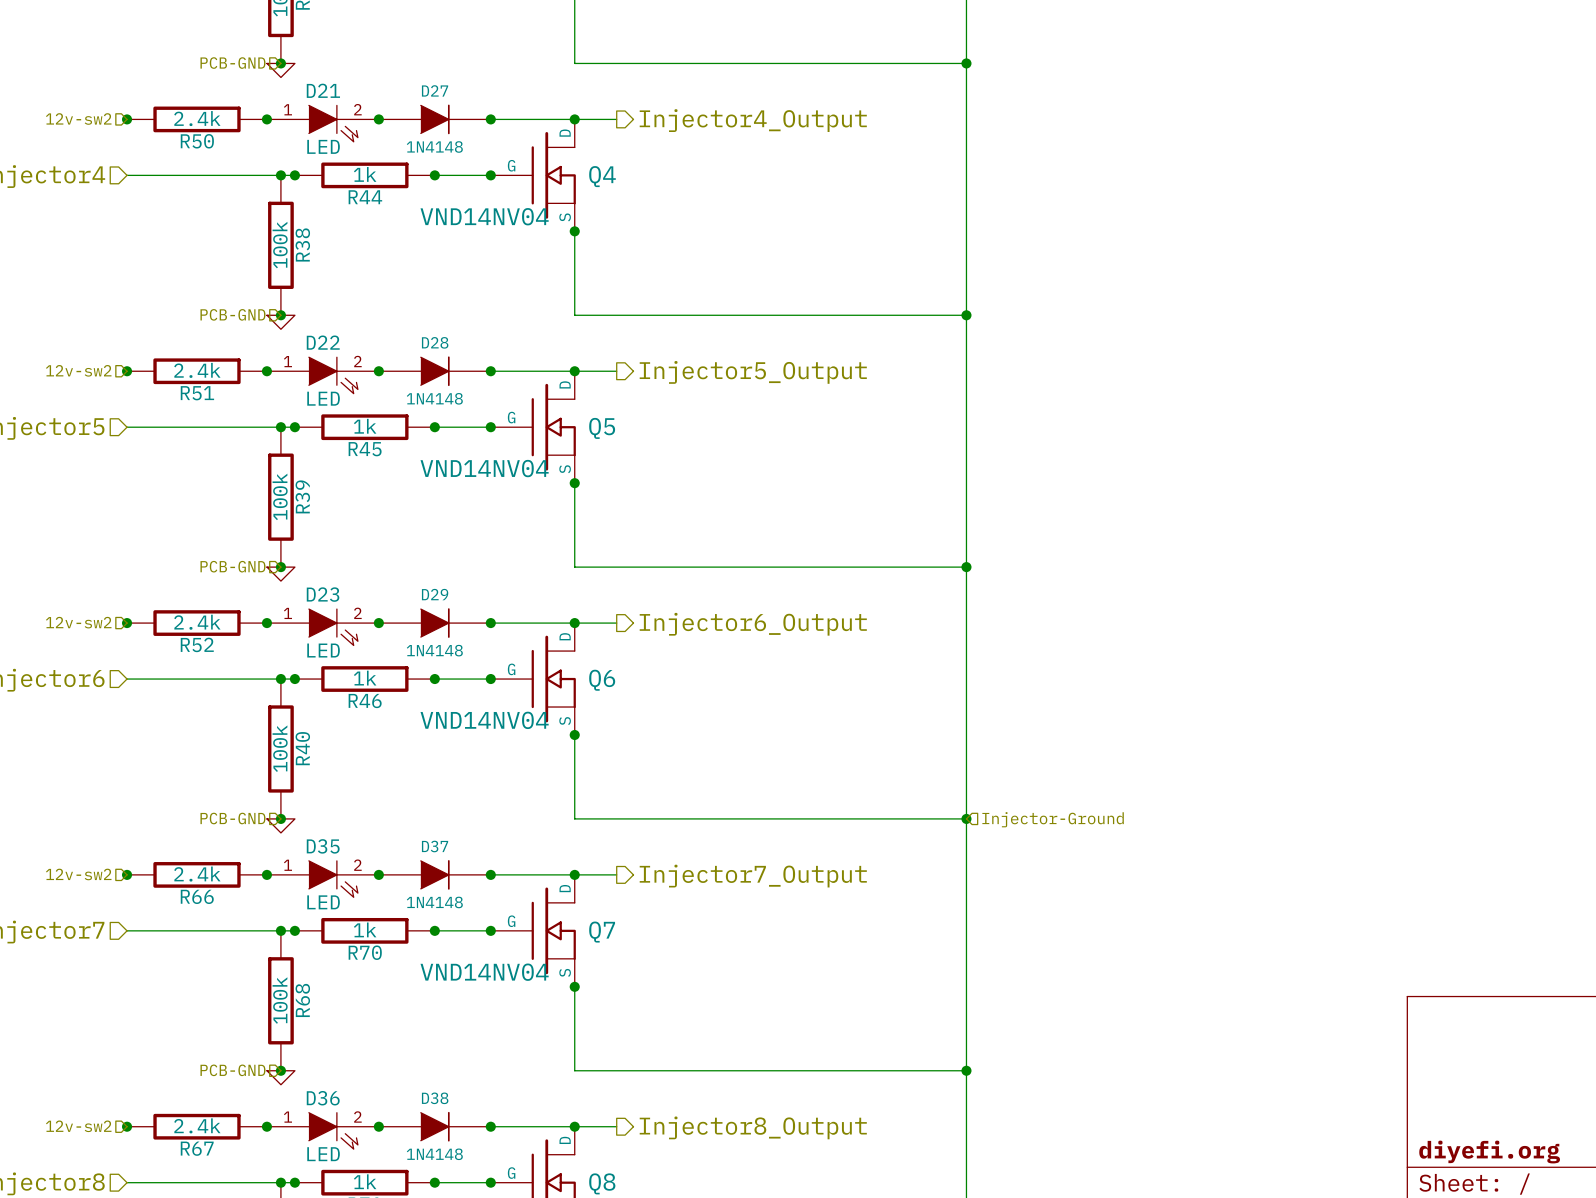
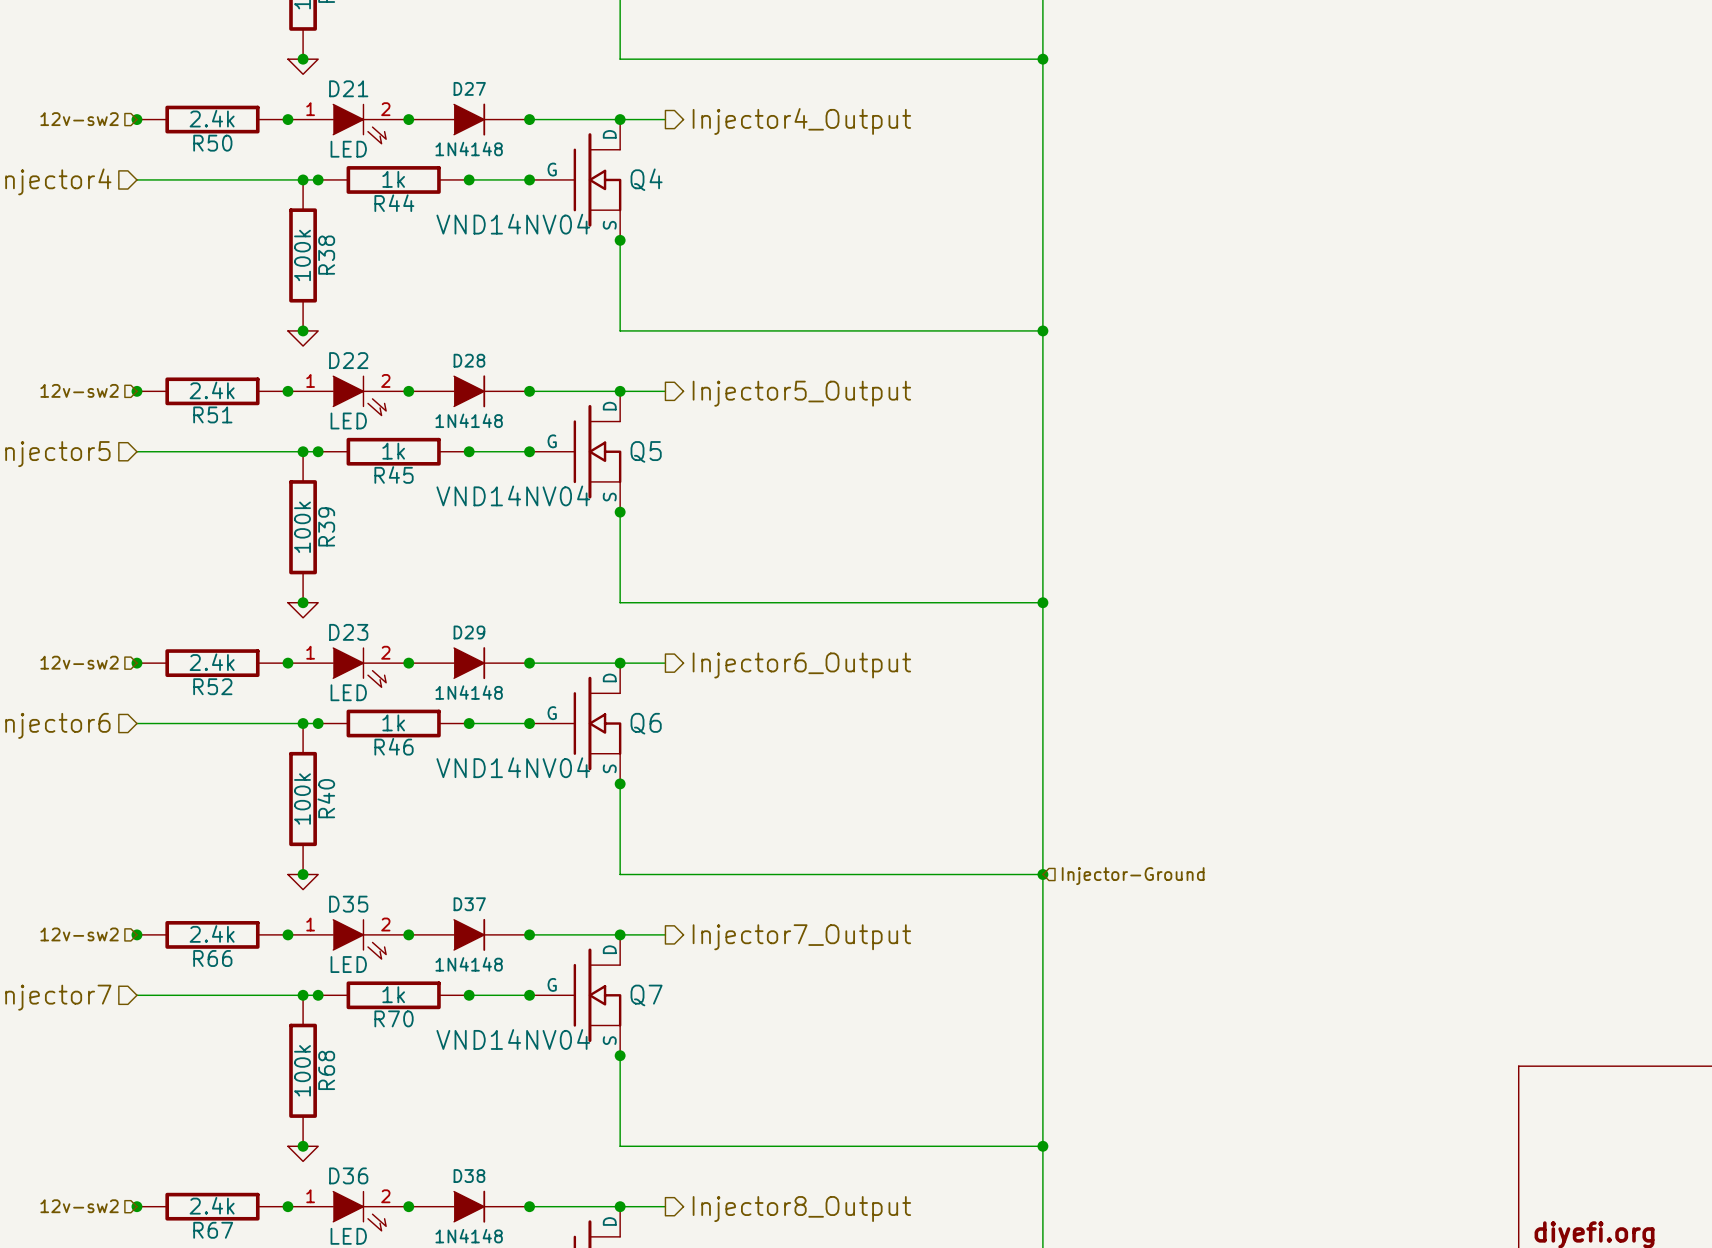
hierarchical label: PCB-GND (232, 63) -> none
hierarchical label: PCB-GND (232, 314) -> none
hierarchical label: PCB-GND (232, 566) -> none
hierarchical label: PCB-GND (232, 818) -> none
hierarchical label: PCB-GND (232, 1070) -> none

